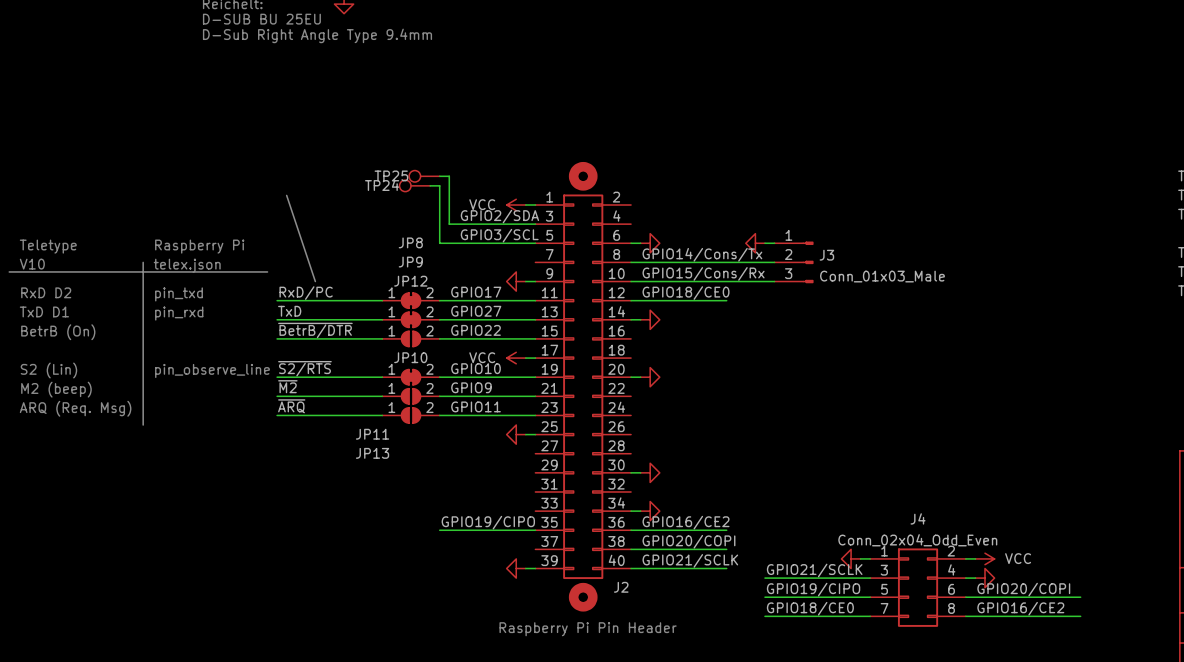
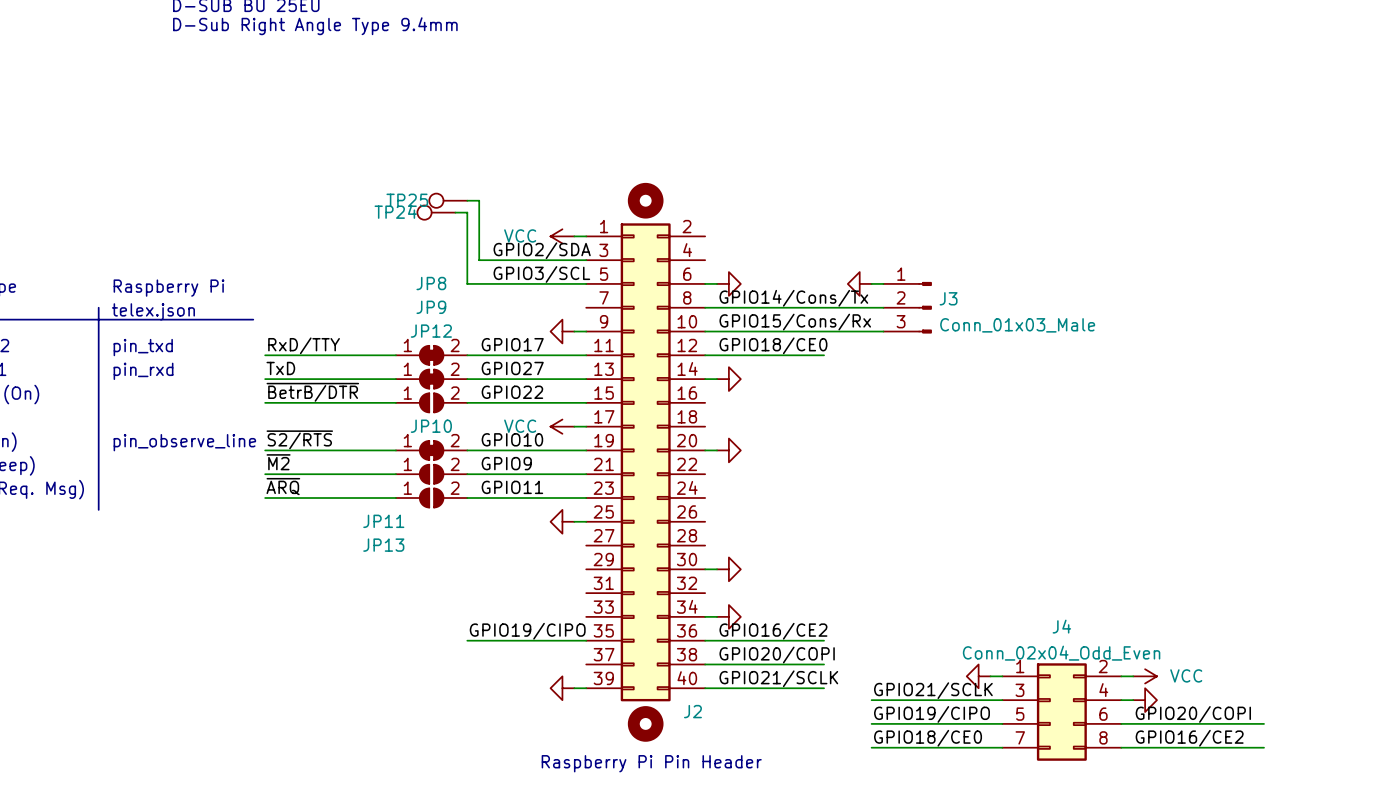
line: (286, 195) (315, 281) -> none
label: RxD/PC (306, 293) -> RxD/TTY (304, 345)

